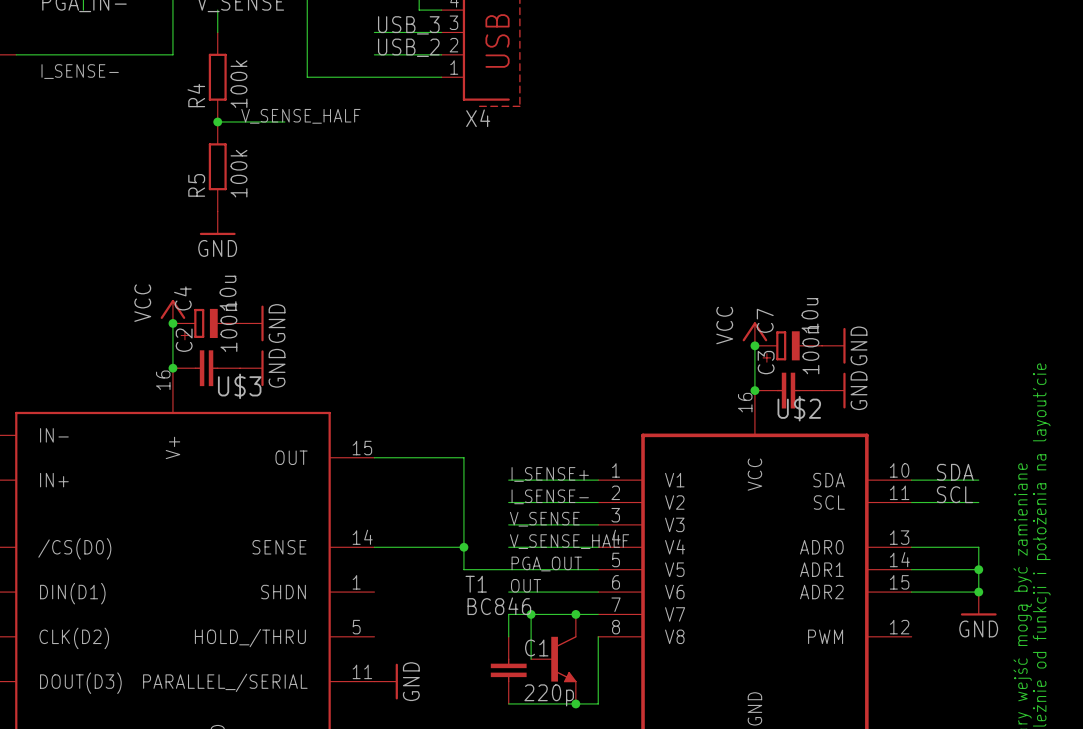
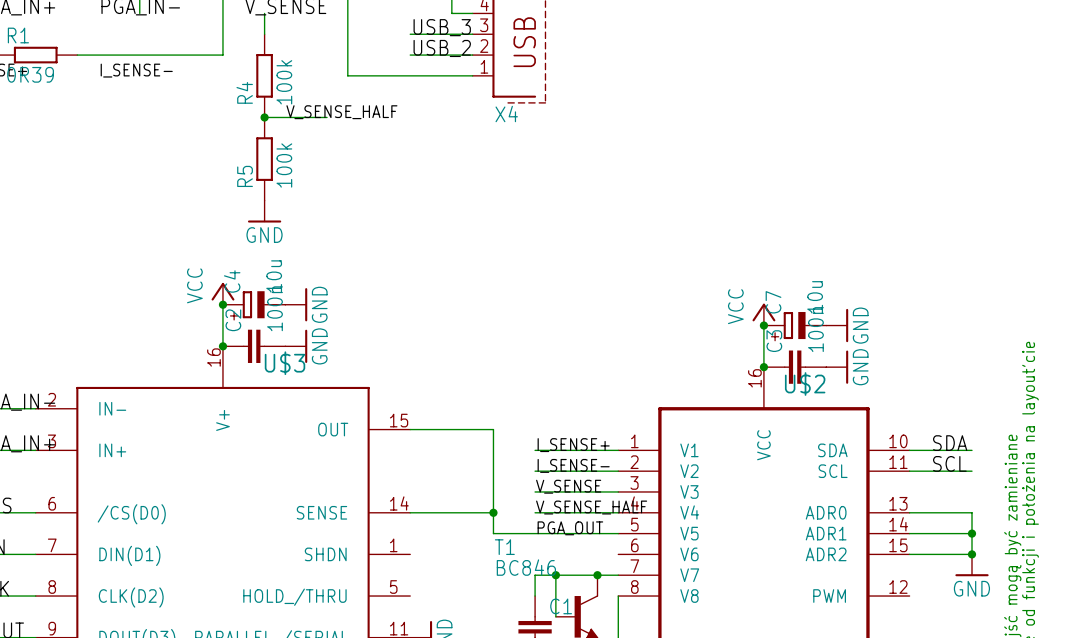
label: OUT (526, 585) -> none
wire: (508, 592) (598, 592) -> none

